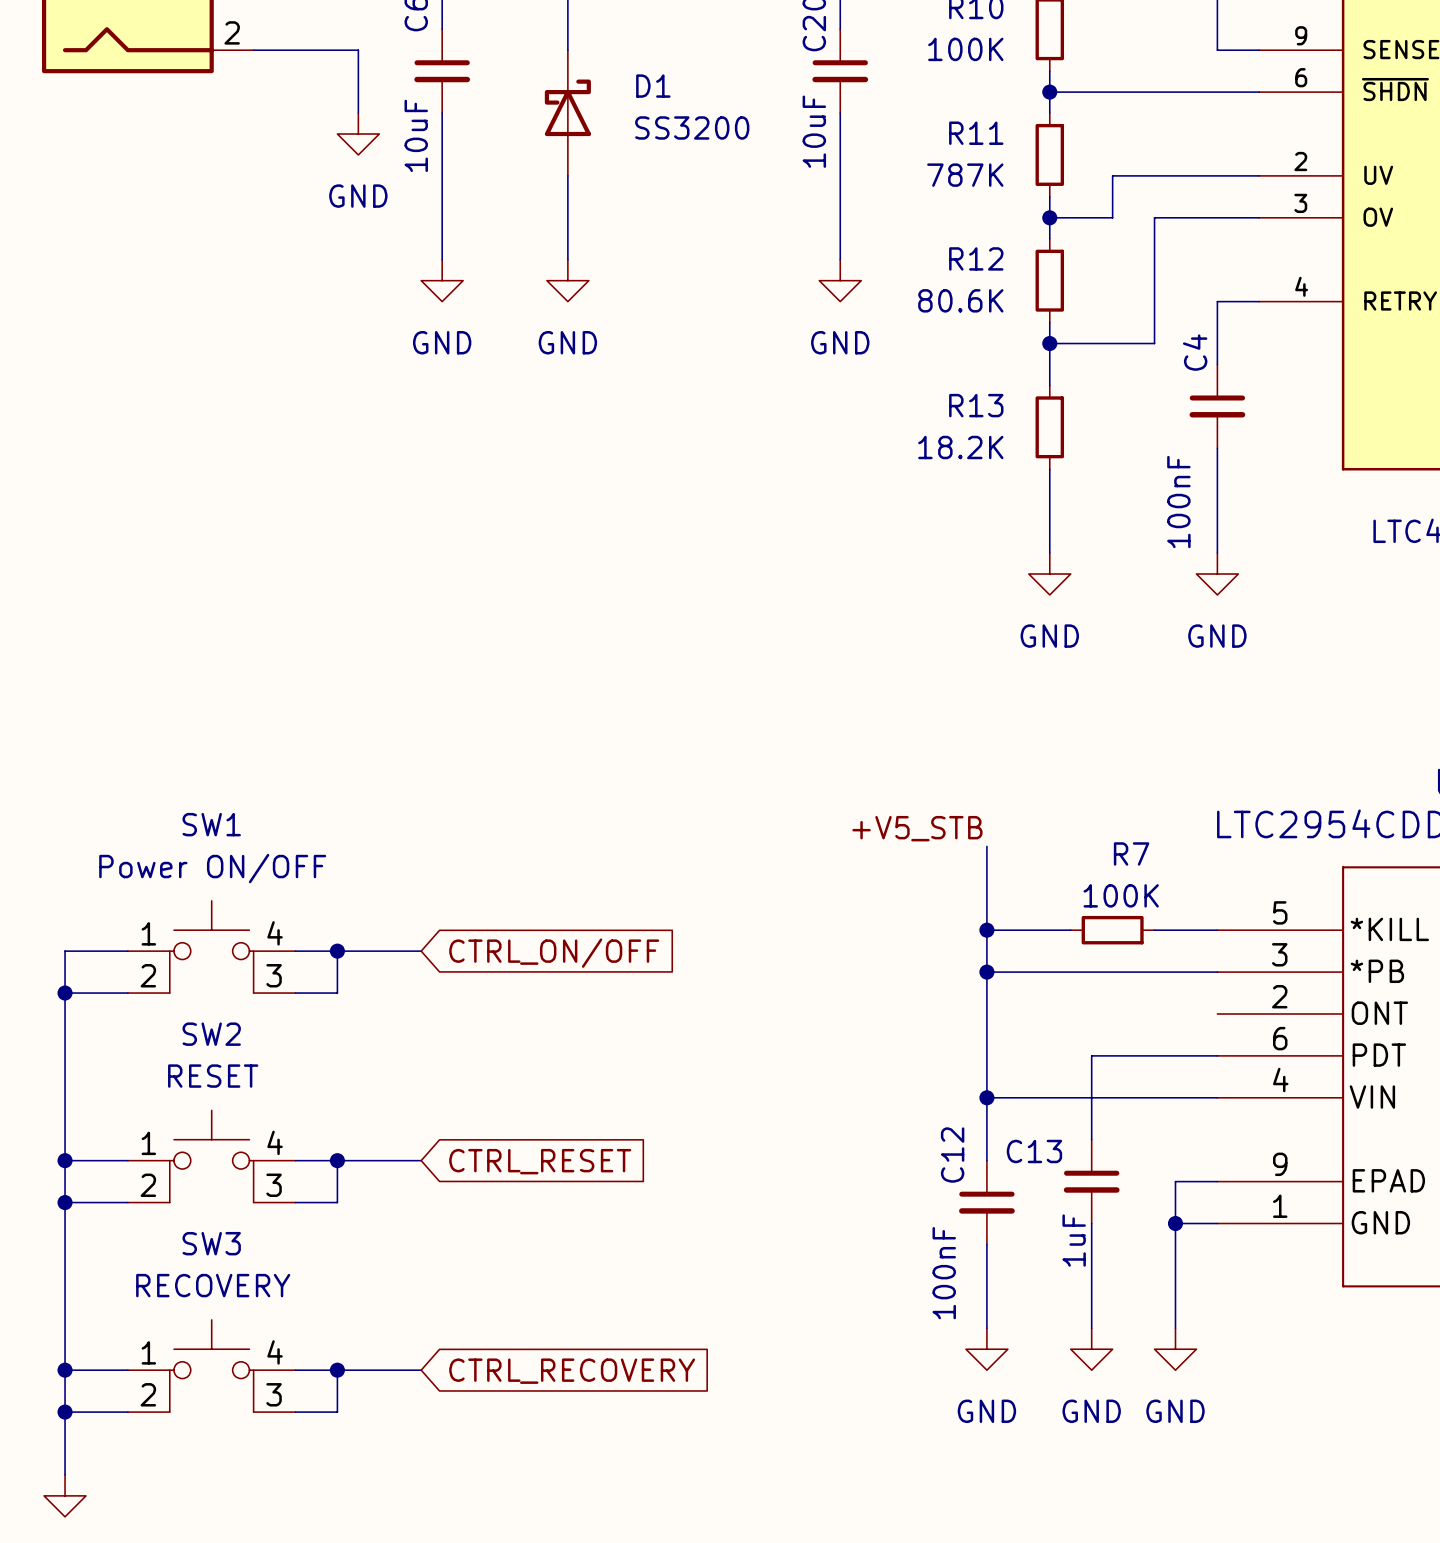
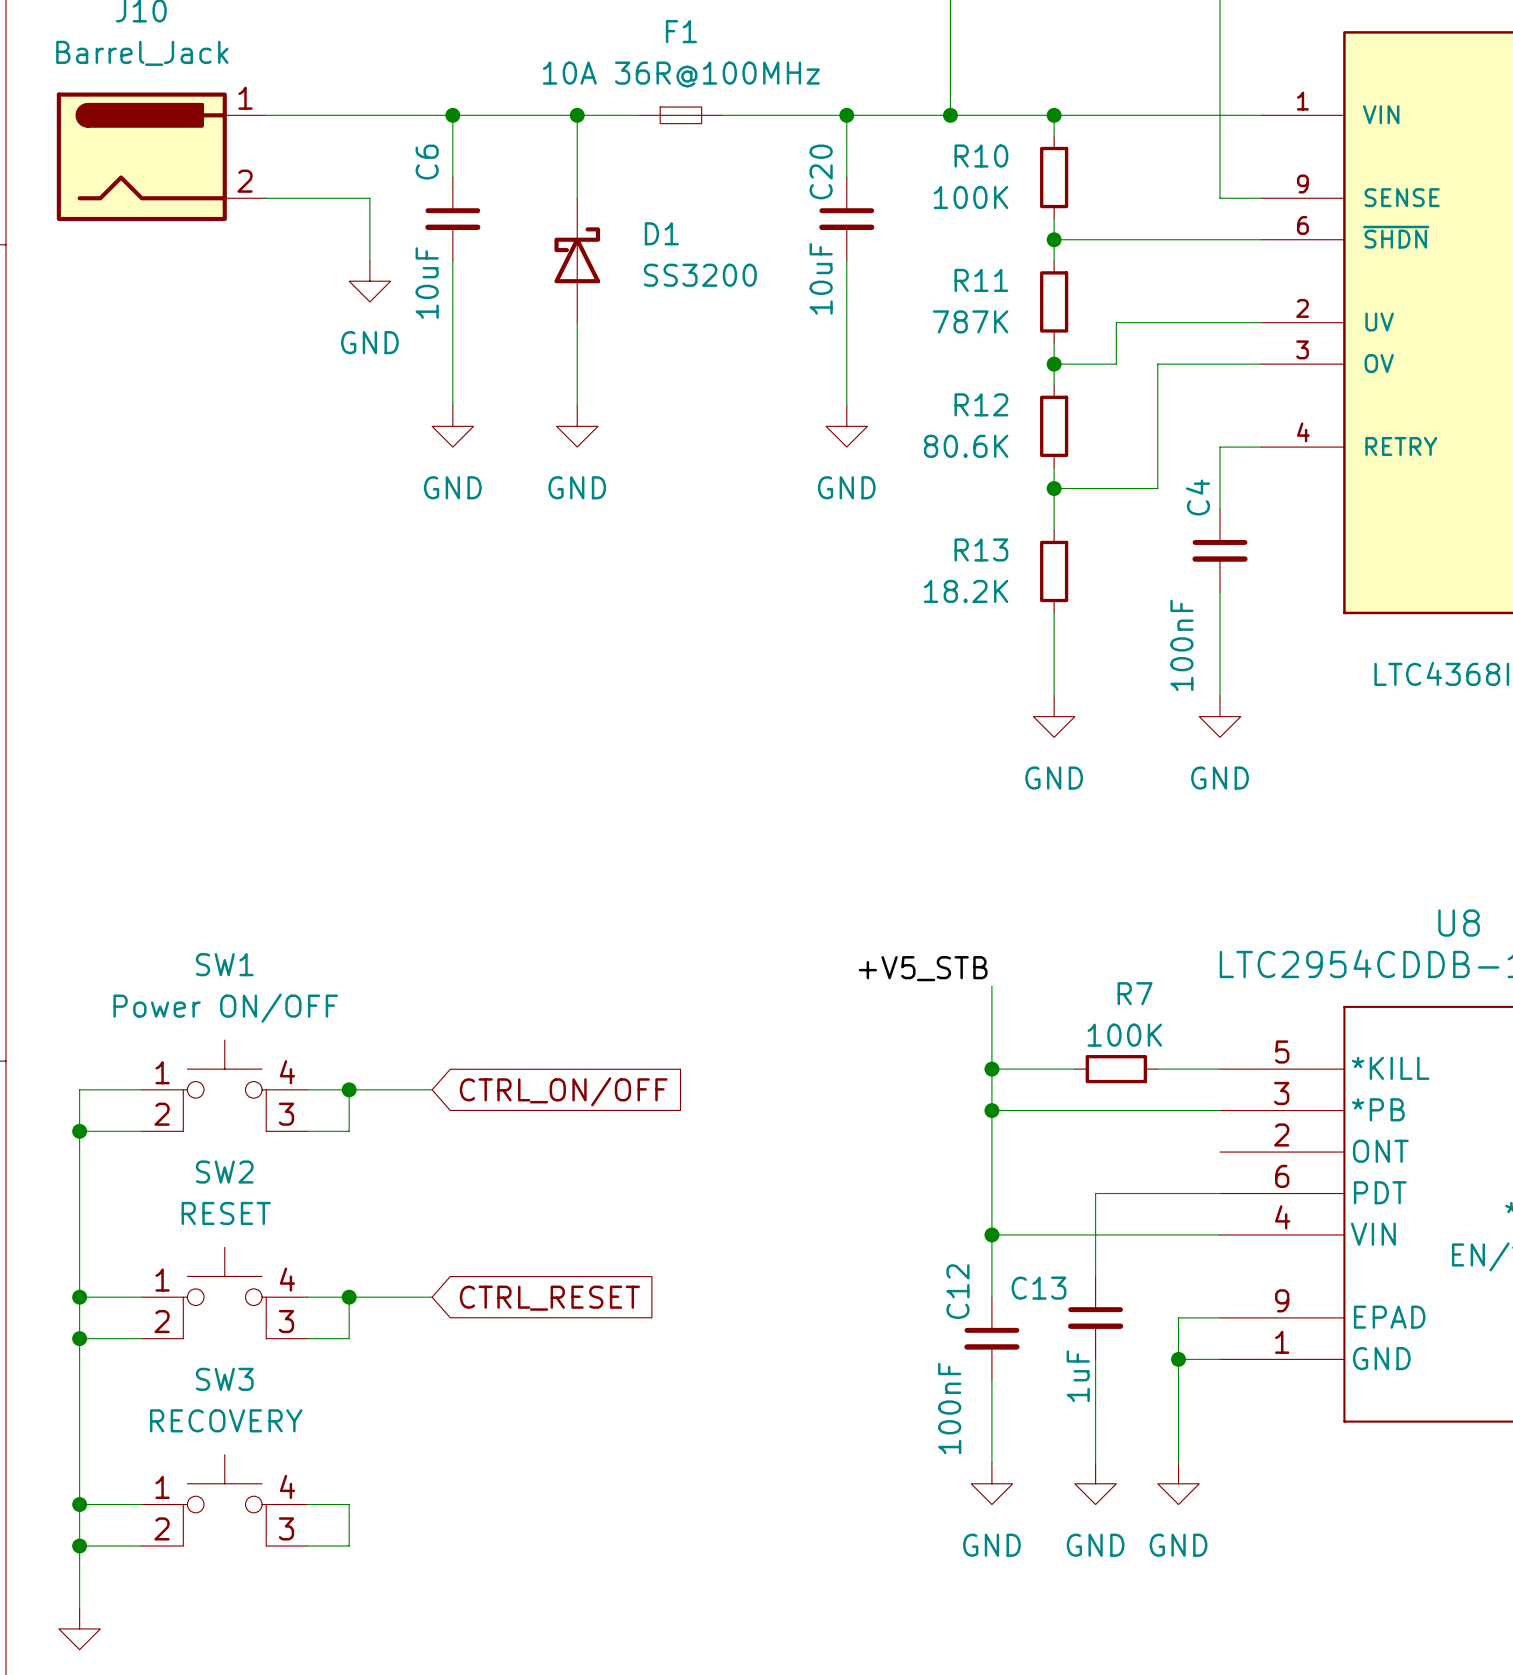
wire: (337, 1370) (421, 1370) -> none
junction: (337, 1370) -> none
global label: CTRL_RECOVERY (572, 1371) -> none

